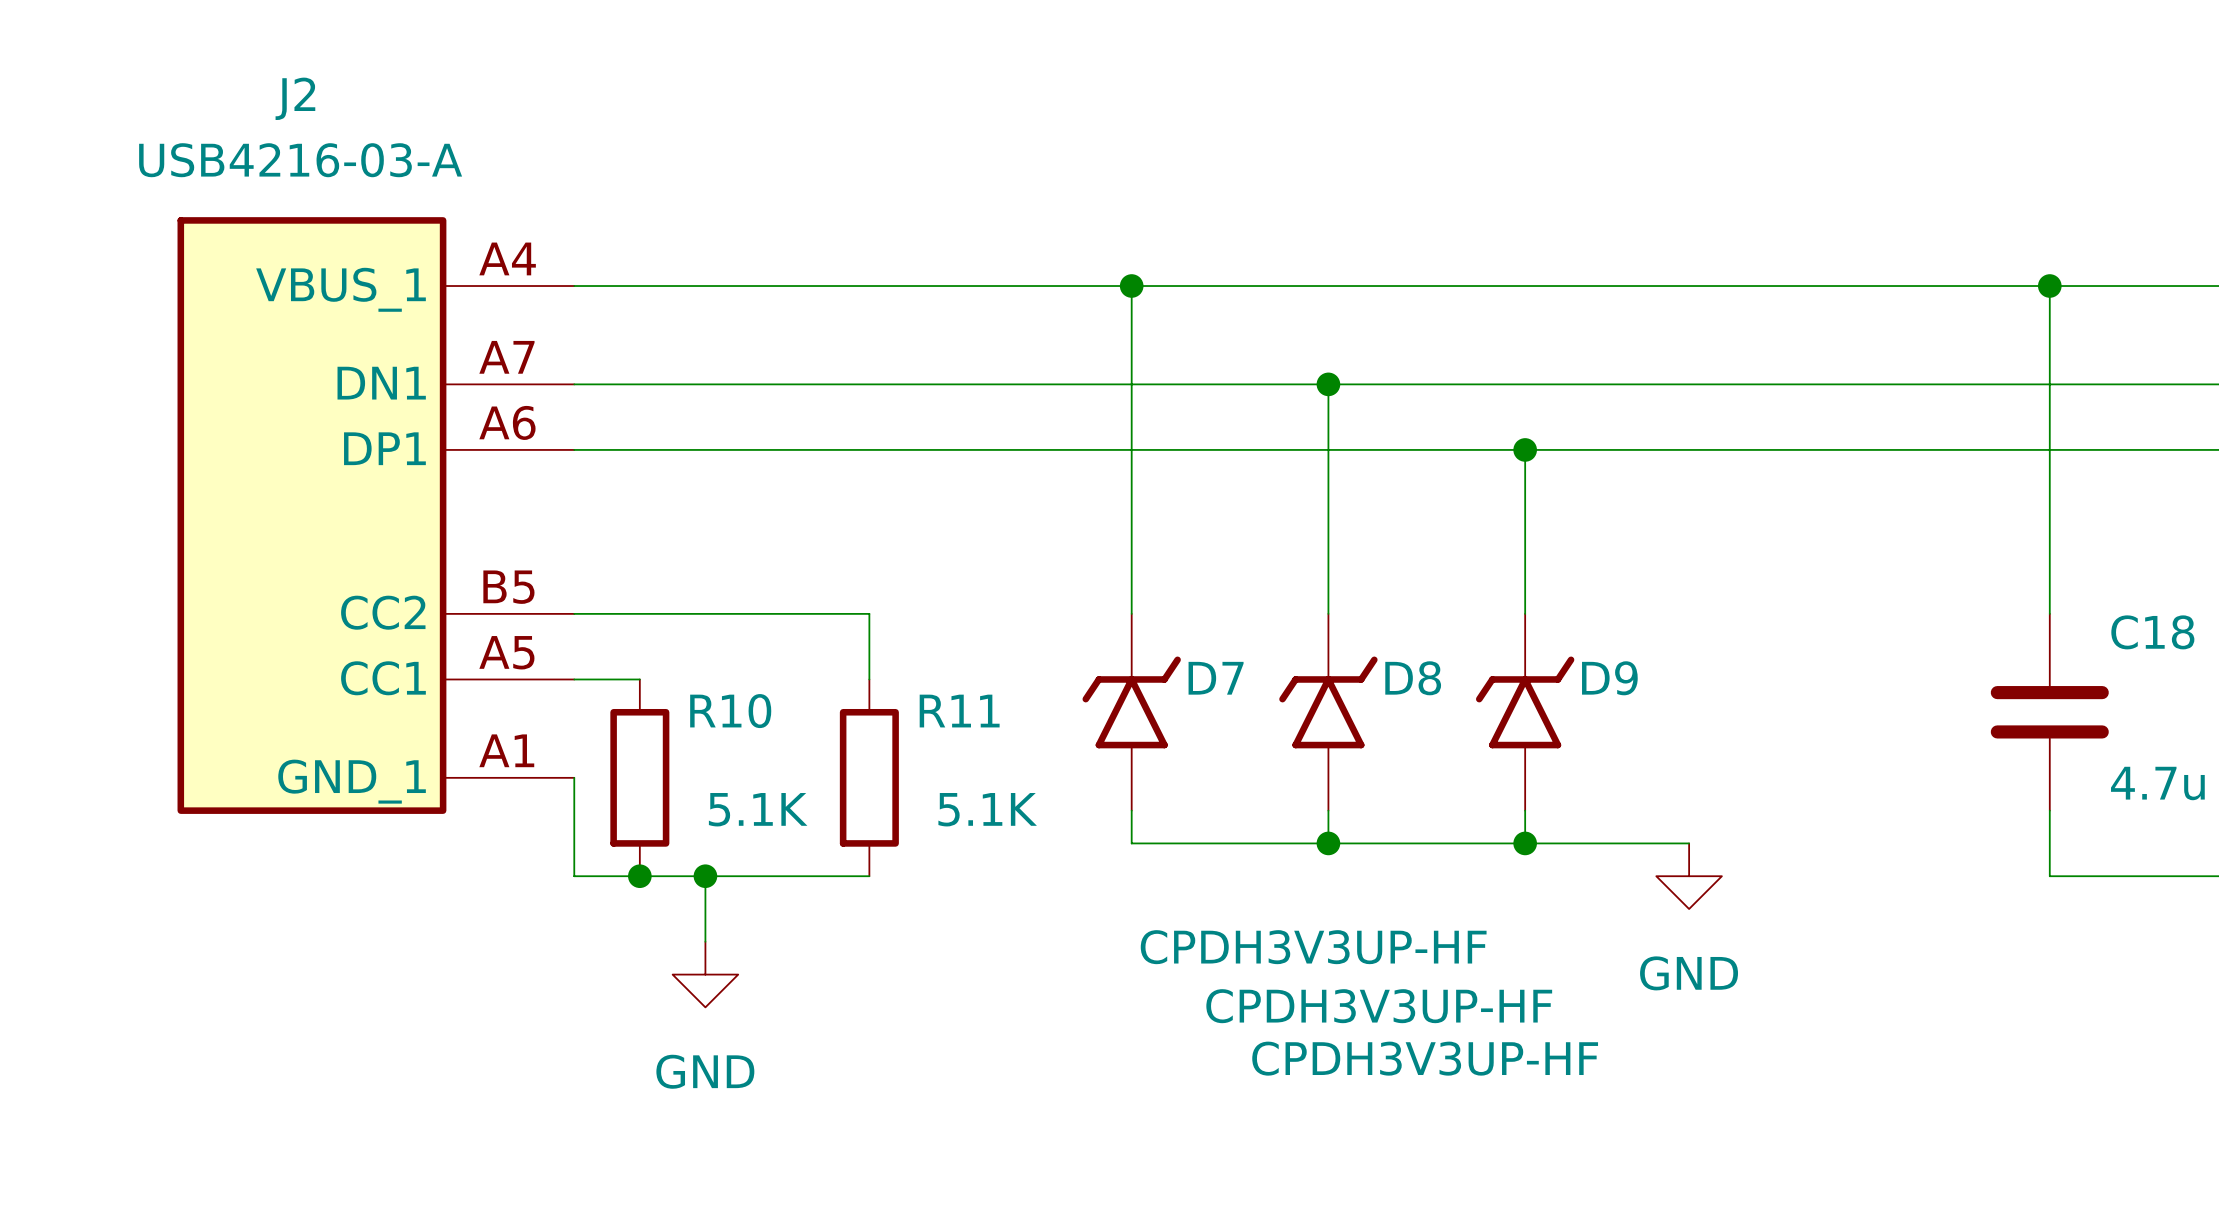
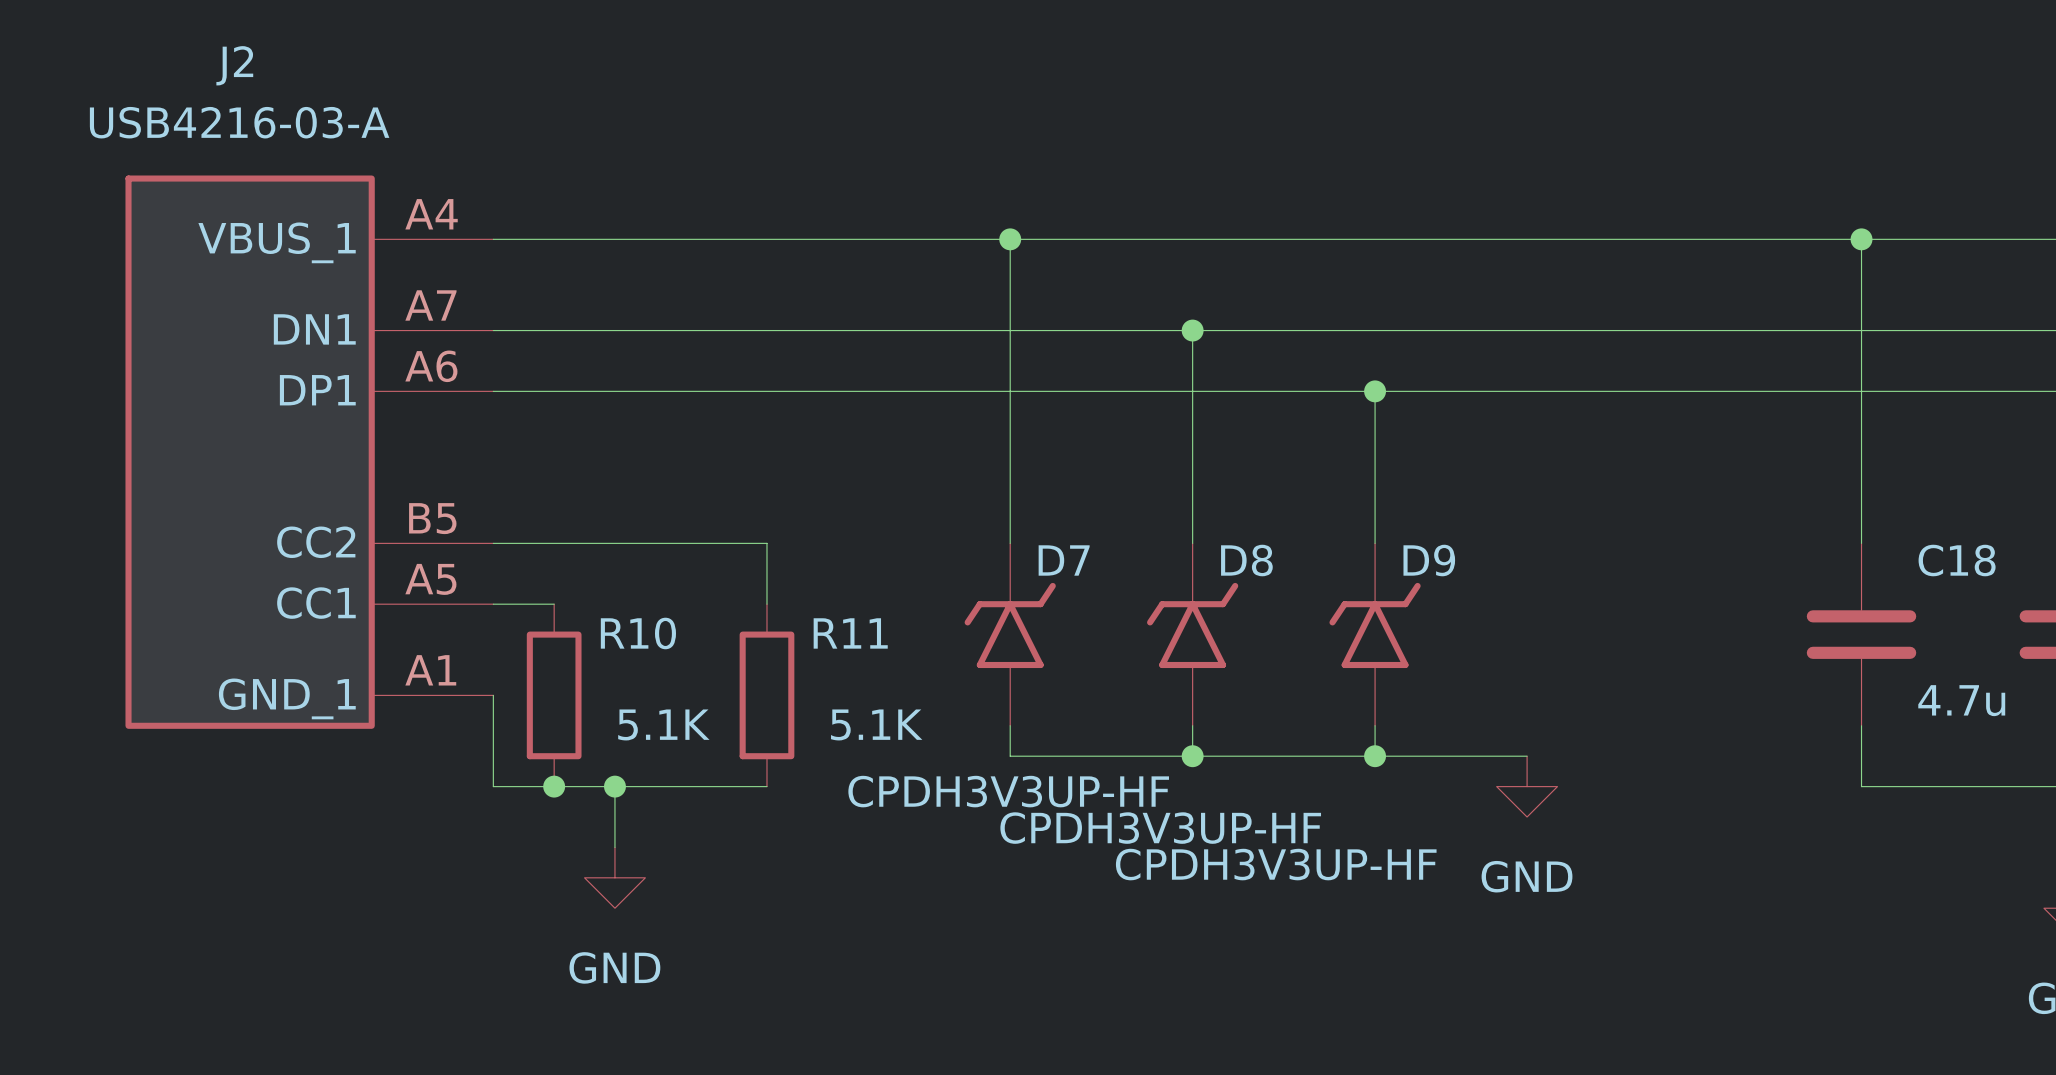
D7 name position: D7 (1216, 678) -> D7 (1064, 560)
D8 name position: D8 (1413, 678) -> D8 (1246, 560)
D9 name position: D9 (1609, 678) -> D9 (1429, 560)
D7 value position: CPDH3V3UP-HF (1313, 947) -> CPDH3V3UP-HF (1008, 791)
D8 value position: CPDH3V3UP-HF (1379, 1006) -> CPDH3V3UP-HF (1160, 828)
D9 value position: CPDH3V3UP-HF (1425, 1058) -> CPDH3V3UP-HF (1276, 864)

